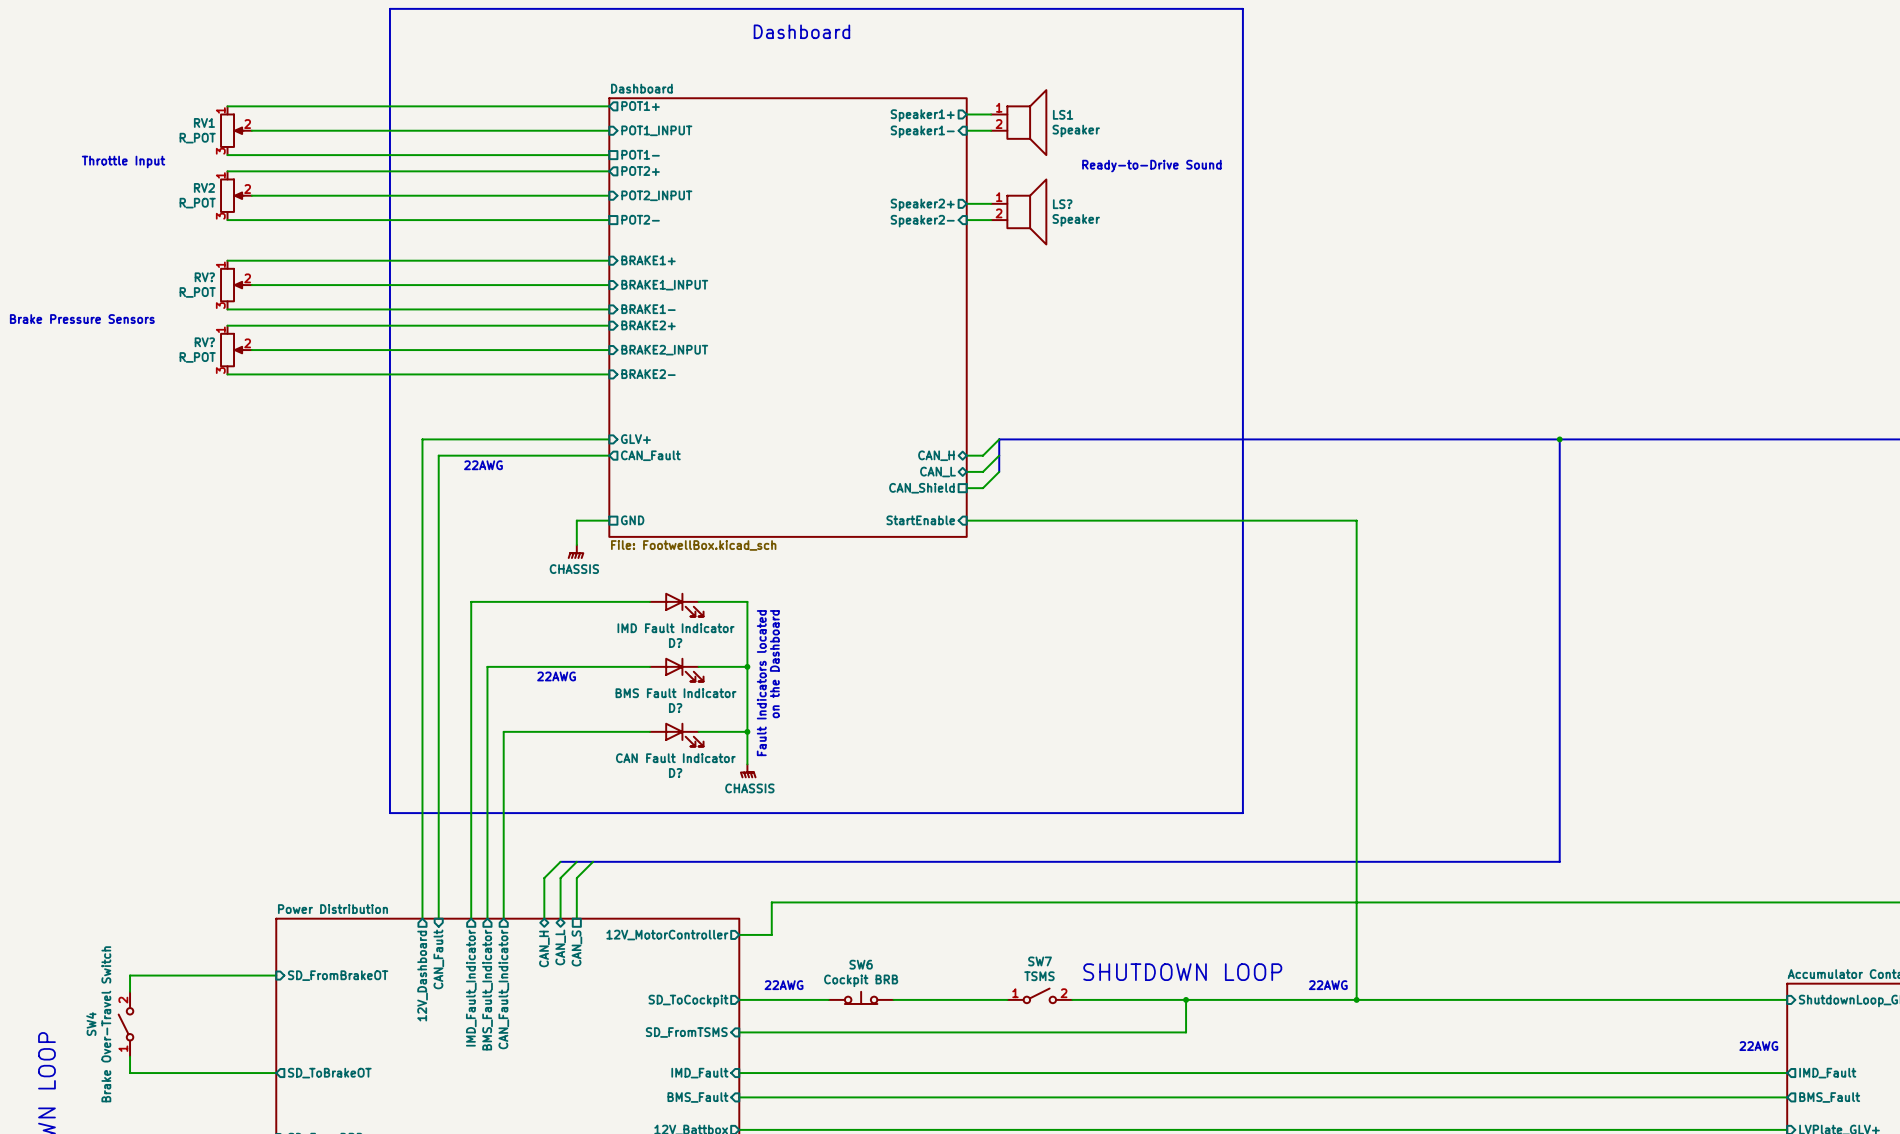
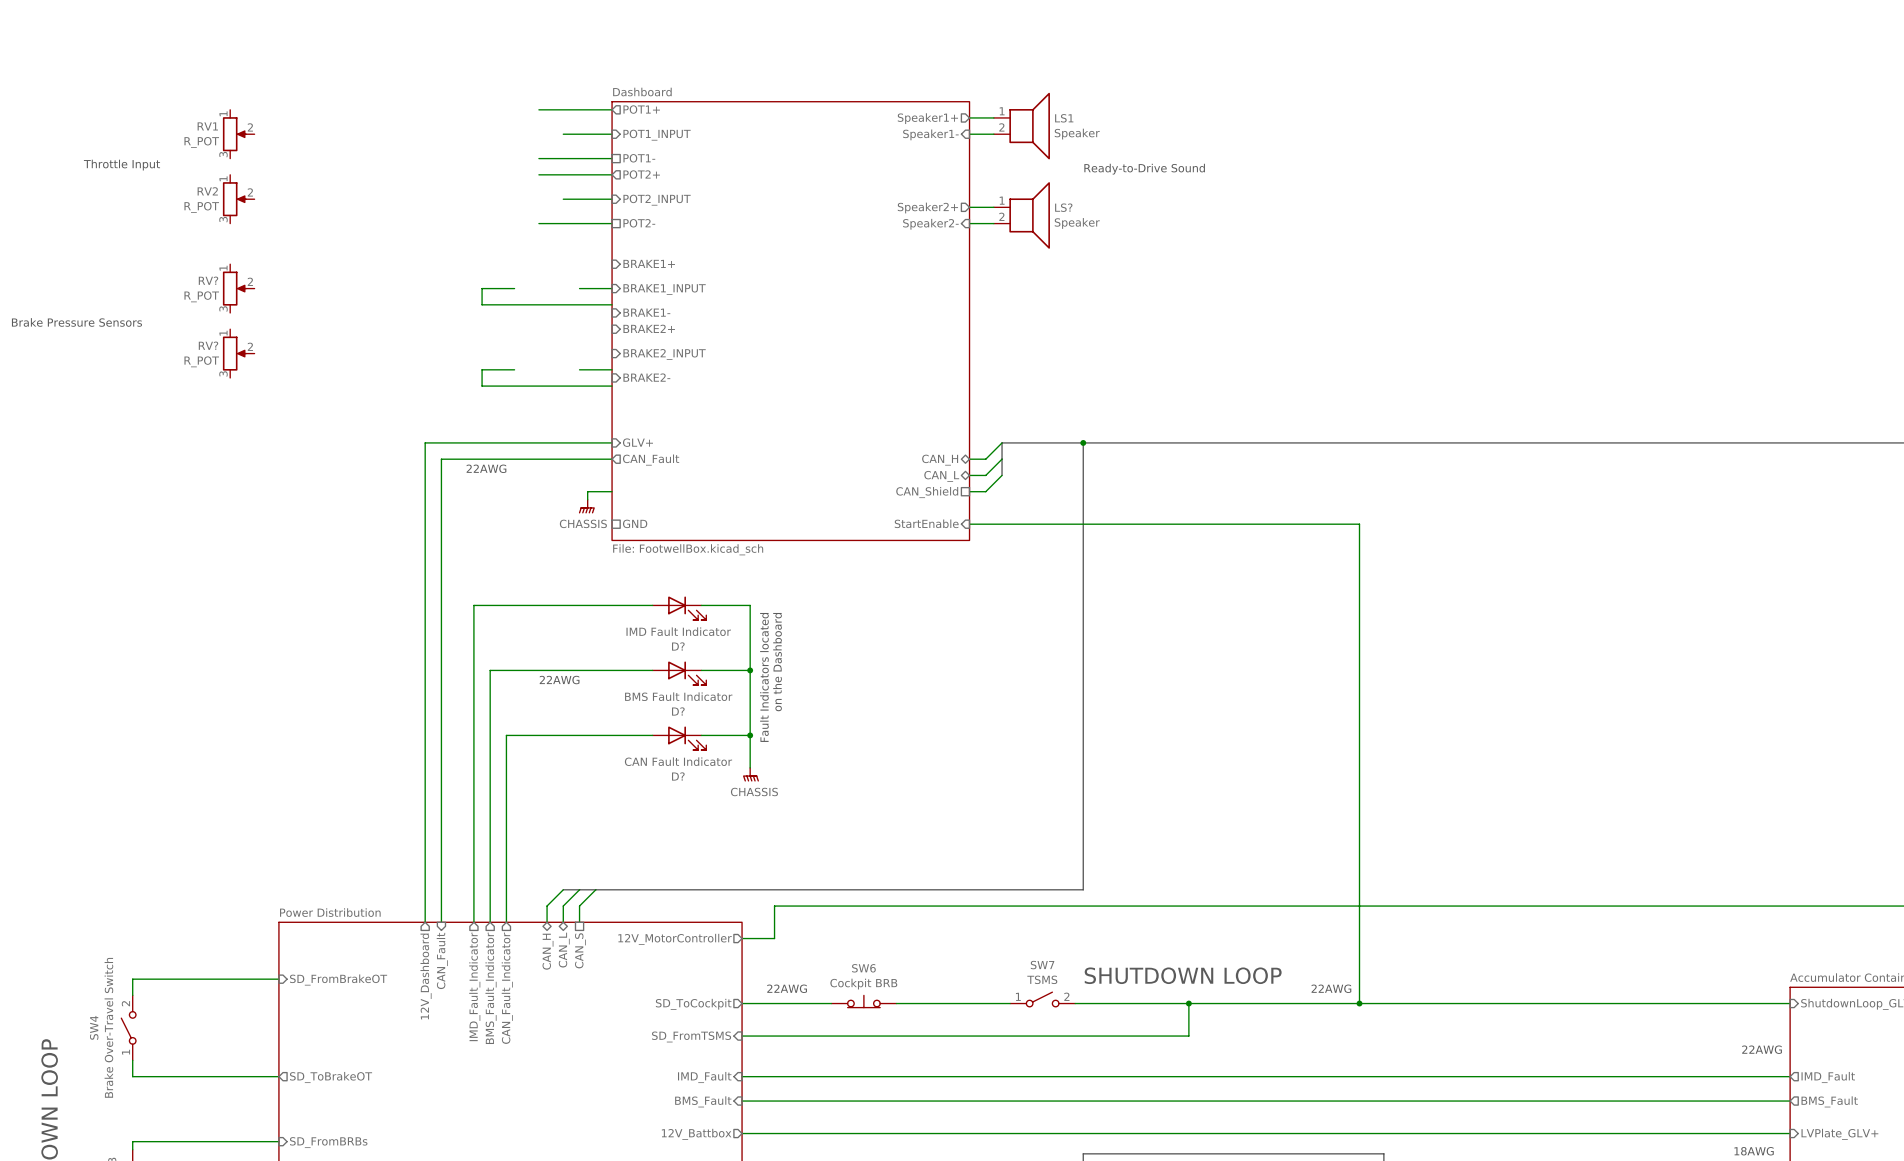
line: (389, 8) (1242, 8) (1242, 813) (389, 813) (389, 8) -> none
text: Dashboard (801, 31) -> none
wire: (227, 106) (536, 106) -> none
wire: (251, 130) (560, 130) -> none
wire: (227, 155) (536, 155) -> none
wire: (227, 171) (536, 171) -> none
wire: (251, 195) (560, 195) -> none
wire: (227, 220) (536, 220) -> none
wire: (227, 260) (609, 260) -> none
wire: (251, 285) (479, 285) -> (612, 304) (482, 304) (482, 288)
wire: (511, 285) (576, 285) -> none
wire: (227, 309) (609, 309) -> none
wire: (227, 325) (609, 325) -> none
wire: (251, 350) (609, 350) -> none
wire: none -> (514, 369) (482, 369) (482, 386) (612, 386)
wire: none -> (579, 369) (612, 369)
wire: (227, 374) (609, 374) -> none
bus: none -> (1083, 442) (1083, 889) (563, 889)
junction: none -> (1083, 442)
bus: (1559, 439) (1559, 861) (560, 861) -> none
junction: (1559, 439) -> none
wire: none -> (612, 491) (587, 491) (587, 499)
wire: (609, 520) (576, 520) (576, 545) -> none
part position: (576, 551) -> (586, 506)
wire: (560, 861) (544, 878) (544, 902) -> (563, 889) (547, 906)
wire: (576, 861) (560, 878) (560, 902) -> (579, 889) (563, 906)
wire: (593, 861) (576, 878) (576, 902) -> (595, 889) (579, 906)

